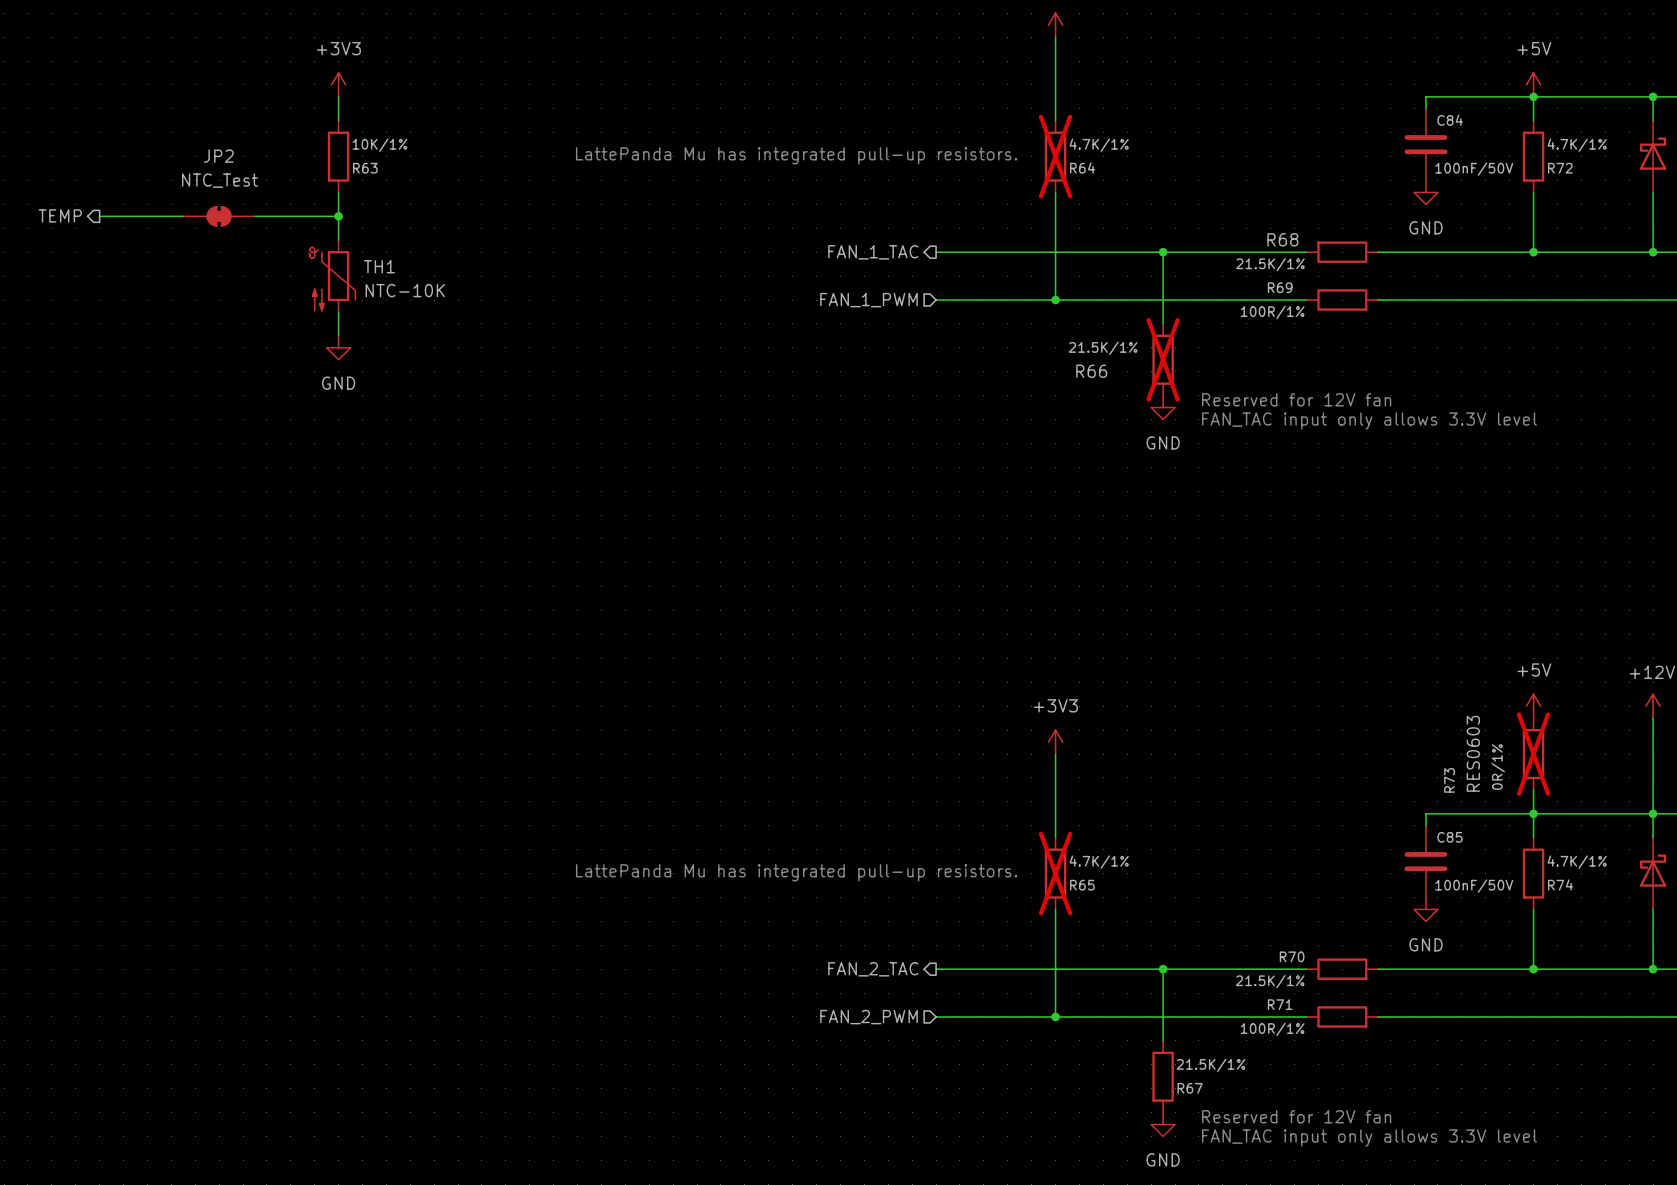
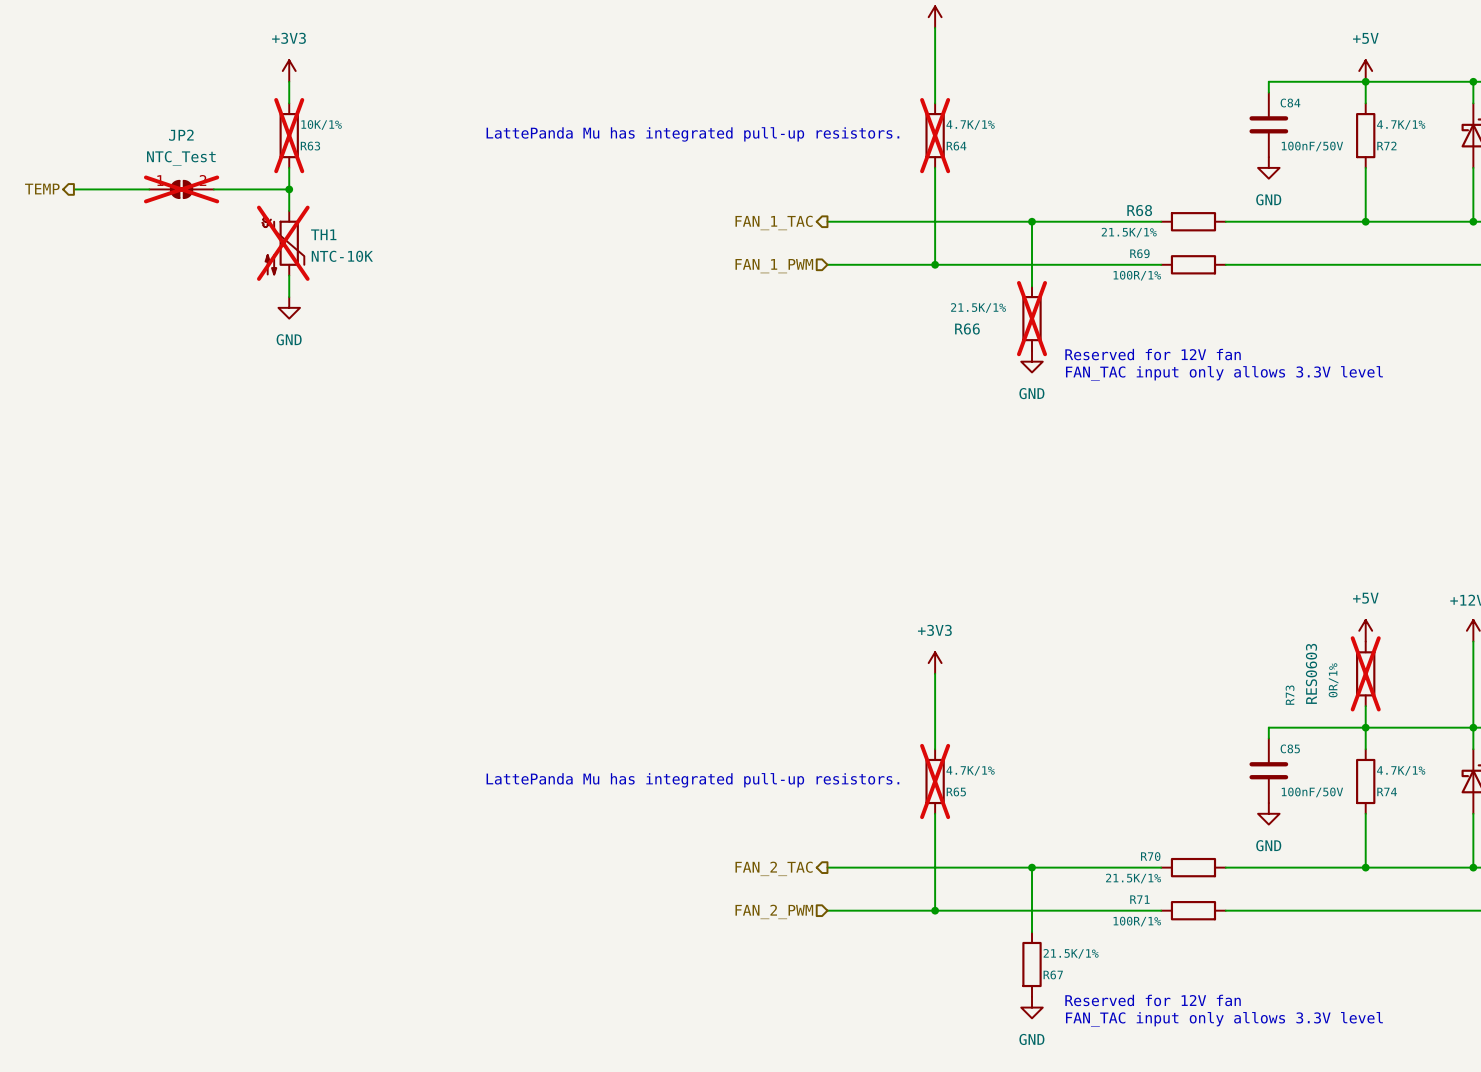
R63 do-not-place cross: none -> (289, 135)
JP2 symbol: [183, 206, 255, 226] -> [149, 180, 214, 199]
JP2 do-not-place cross: none -> (181, 189)
TH1 do-not-place cross: none -> (283, 243)

